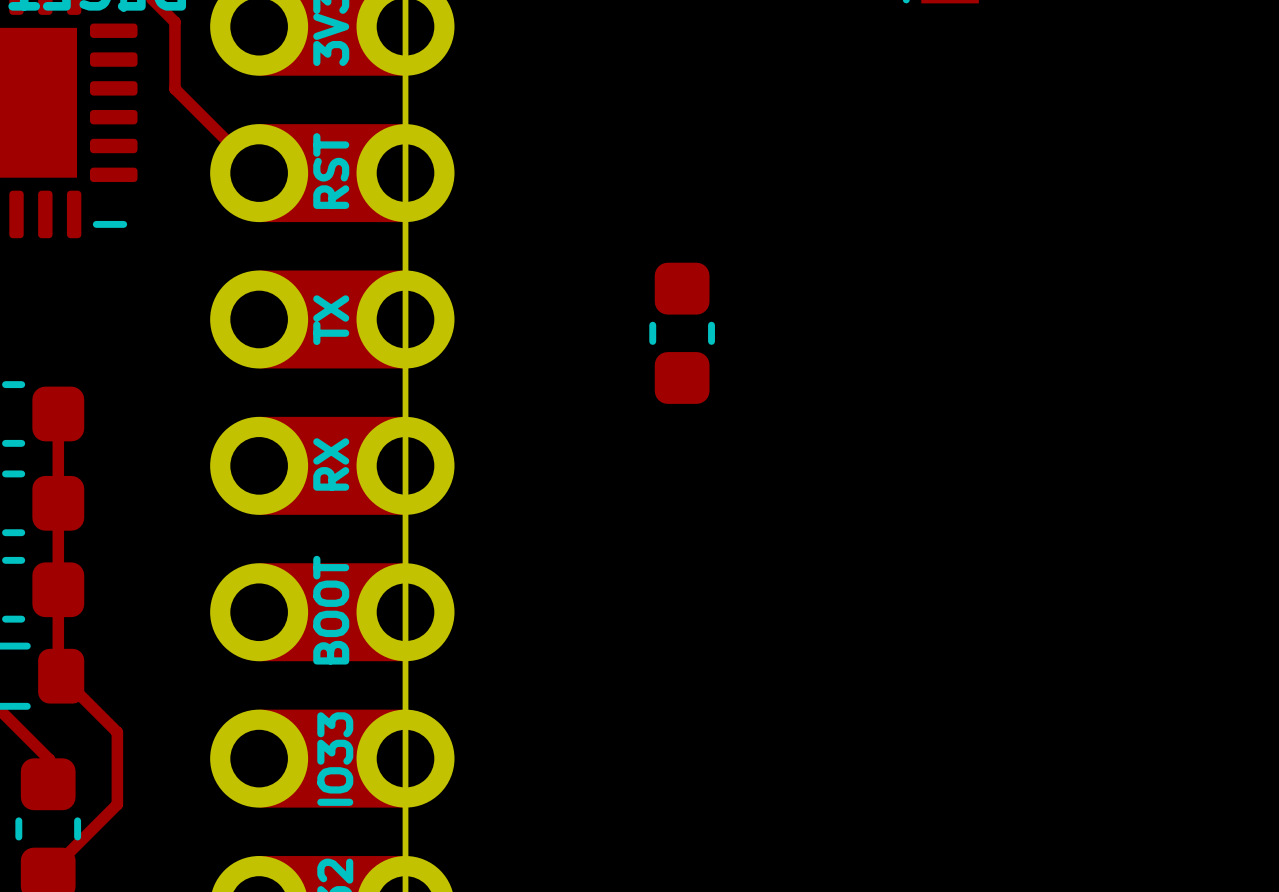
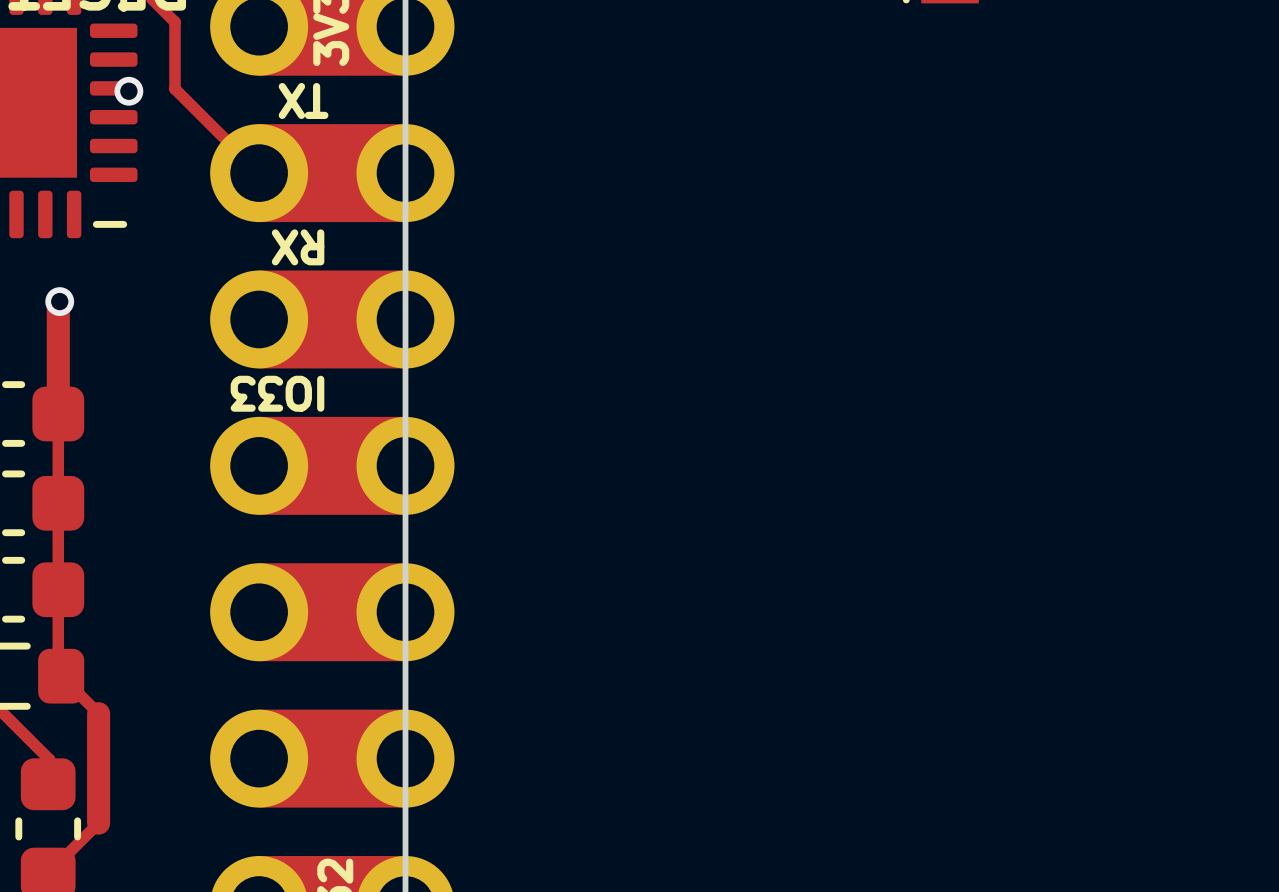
via: none -> (128, 91)
text: RST (331, 171) -> none
track: none -> (59, 301) (58, 413)
via: none -> (59, 301)
text rotation: 0° (331, 320) -> 90° counterclockwise (303, 100)
text position: TX (331, 320) -> TX (303, 100)
part: (682, 333) -> none
text rotation: 0° (331, 464) -> 90° counterclockwise (298, 247)
text position: RX (331, 464) -> RX (298, 247)
text: BOOT (331, 610) -> none
track: (98, 713) (117, 732) (117, 804) (98, 823) -> (98, 713) (98, 823)
text rotation: 0° (335, 759) -> 90° counterclockwise (277, 393)
text position: IO33 (335, 759) -> IO33 (277, 393)

